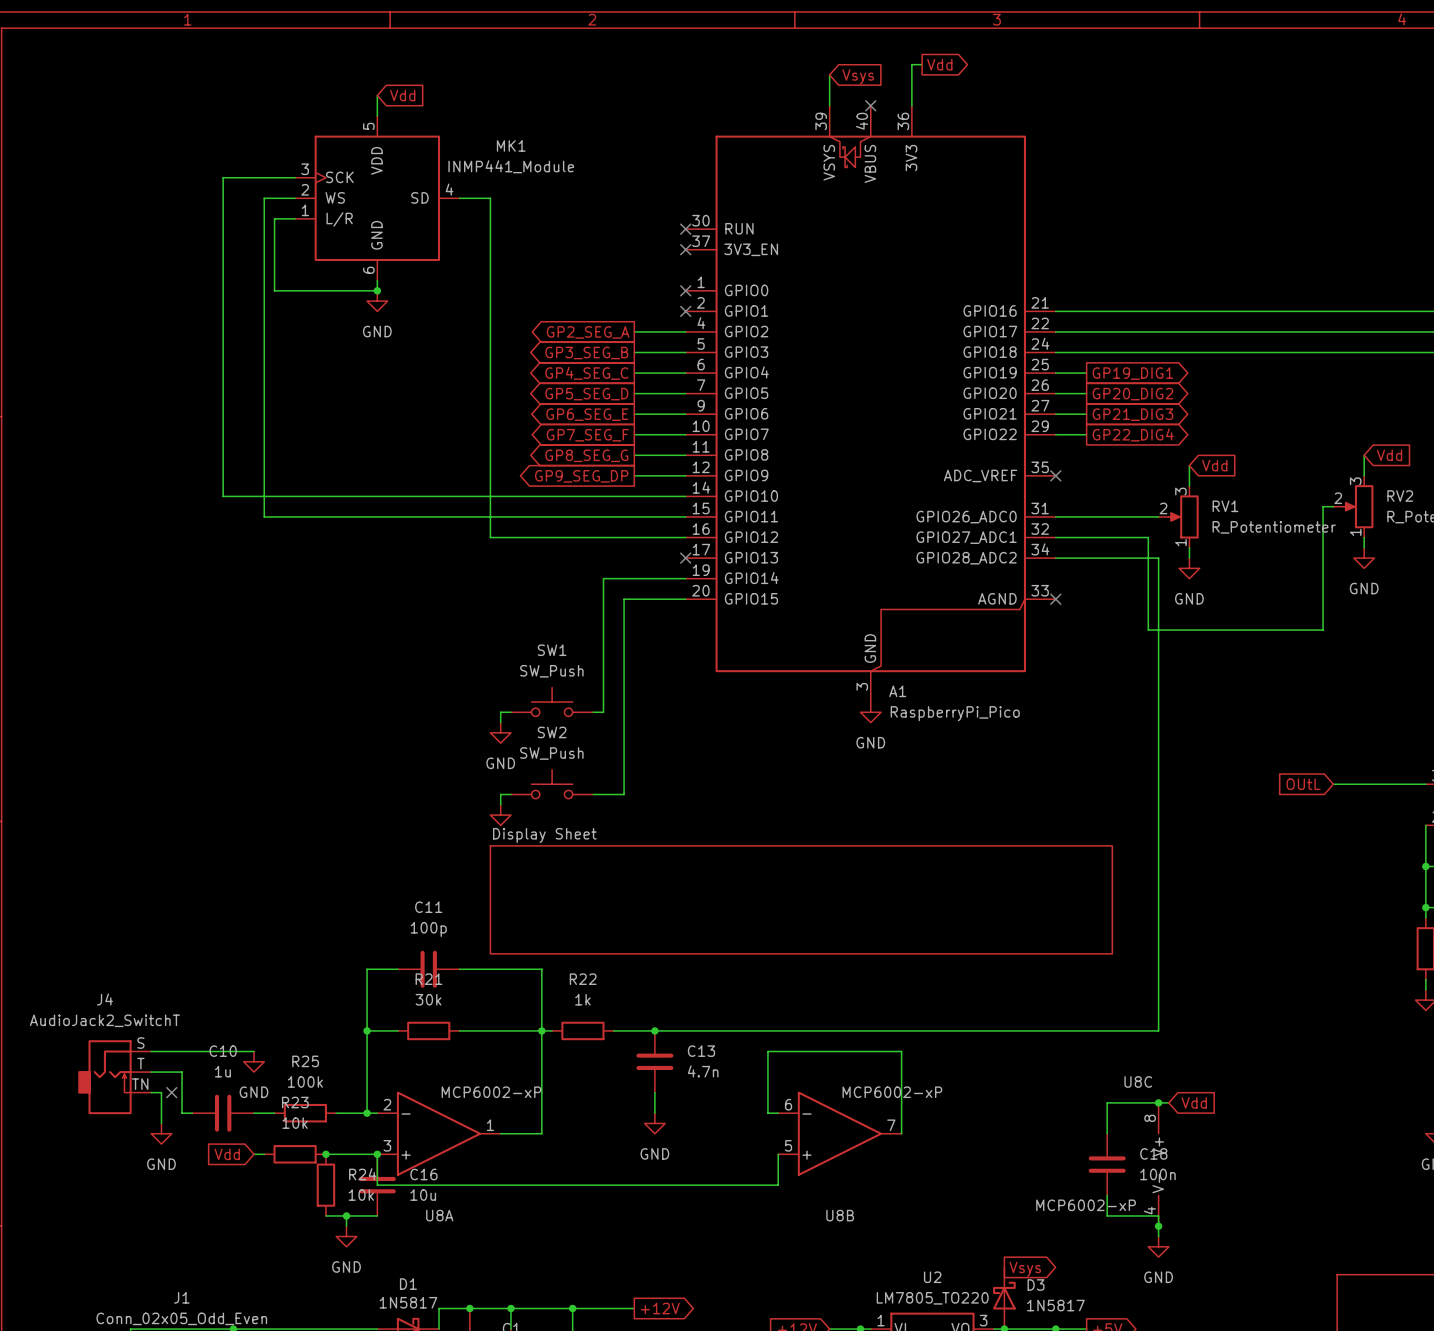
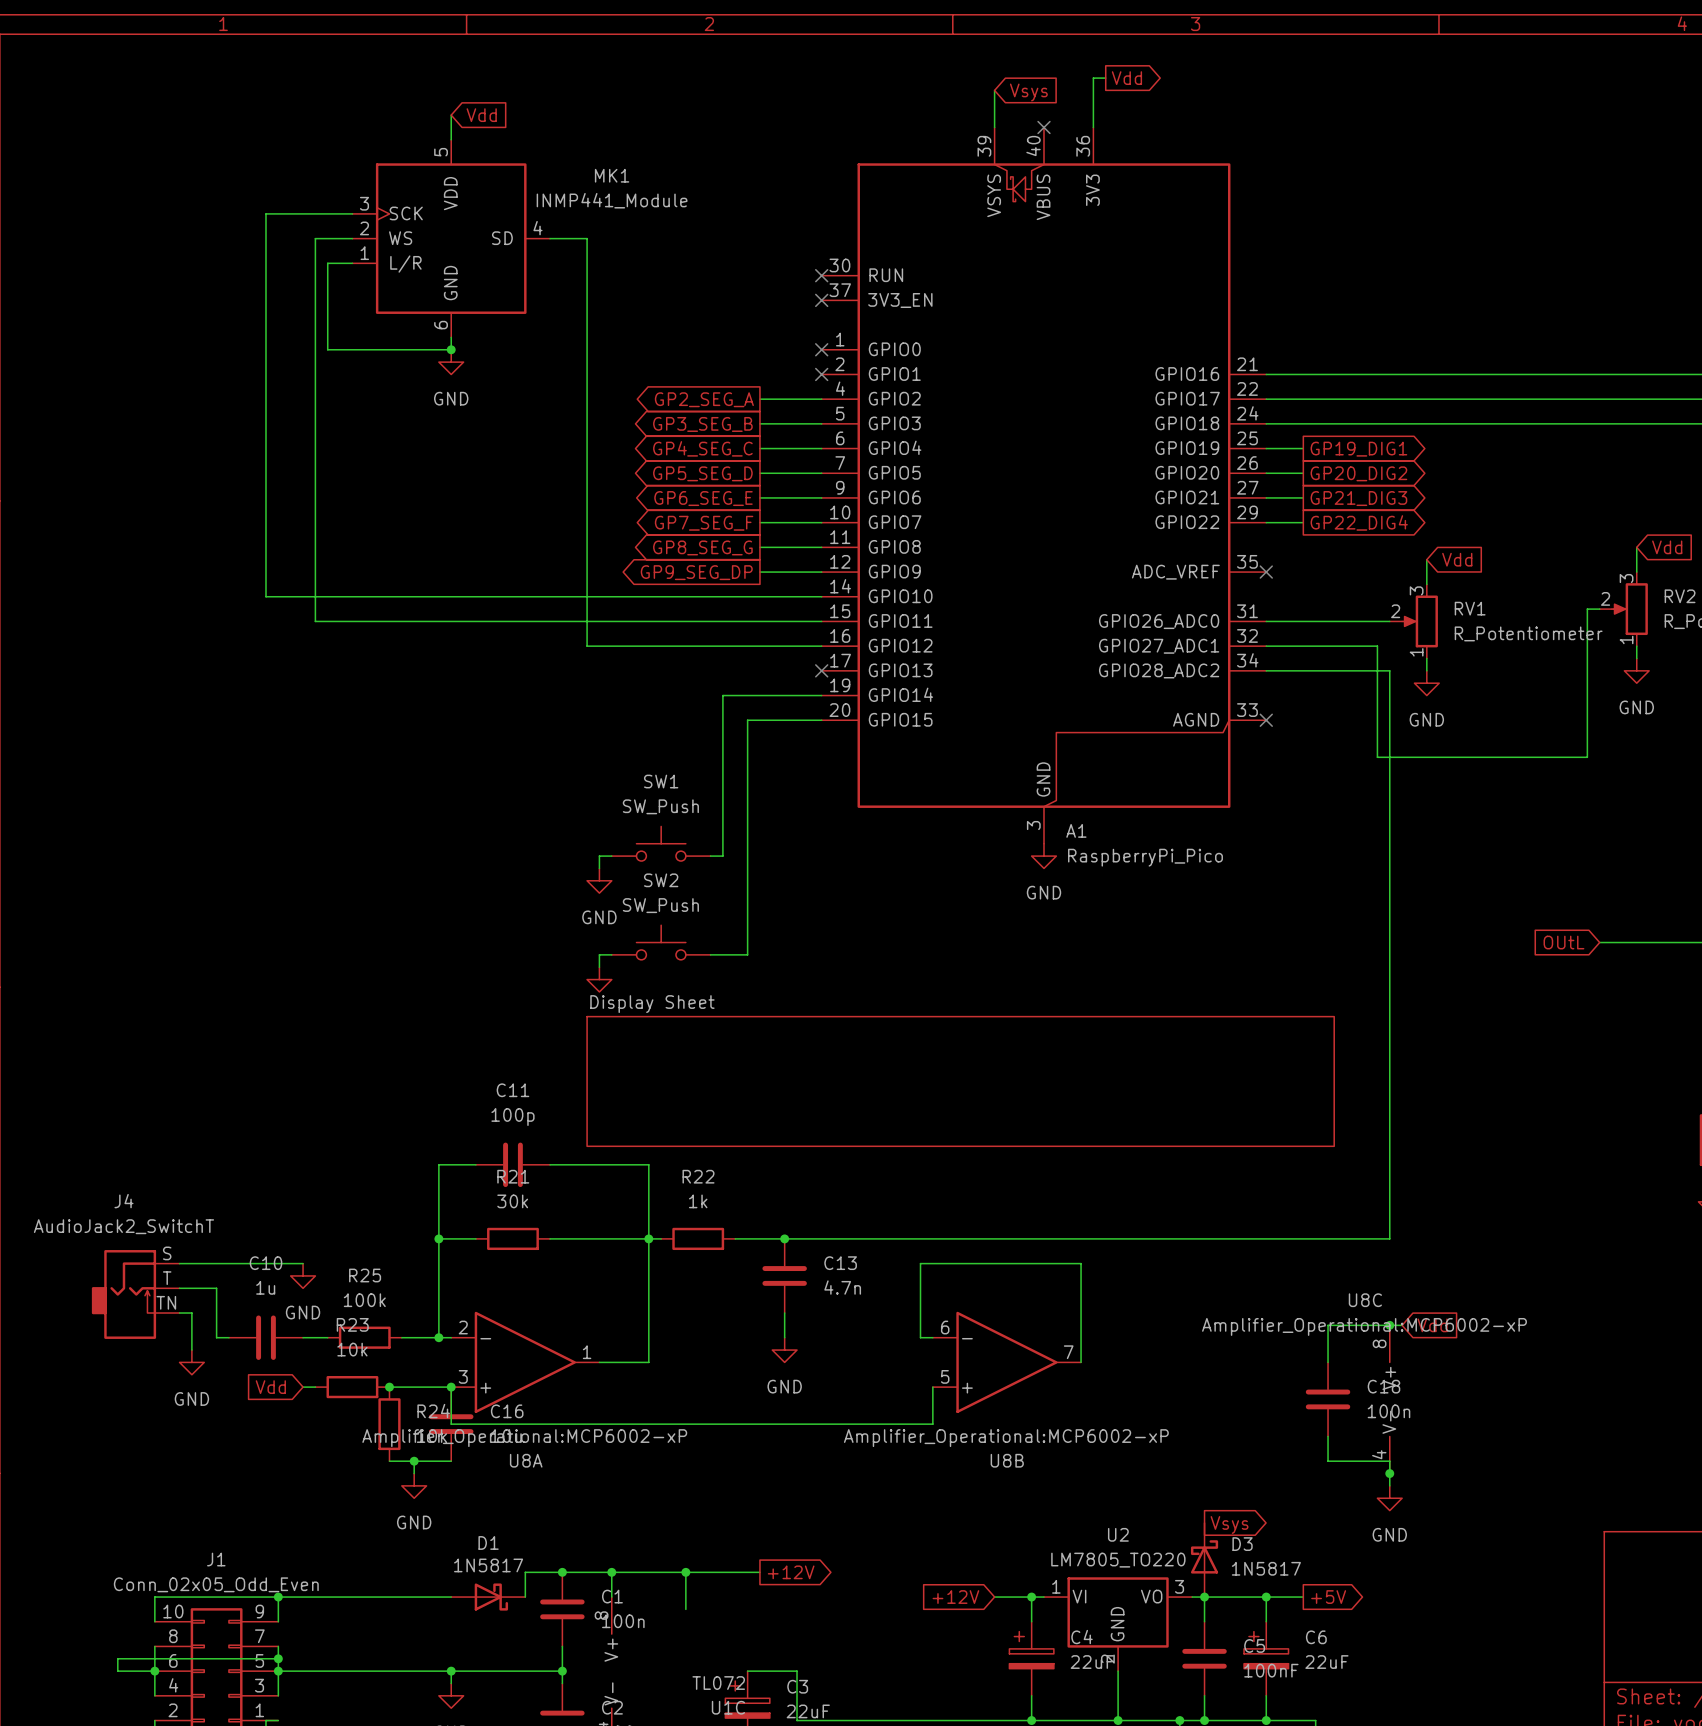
no-connect mark: (171, 1092) -> none
U8A value: MCP6002-xP (491, 1092) -> Amplifier_Operational:MCP6002-xP (524, 1438)
U8B value: MCP6002-xP (892, 1092) -> Amplifier_Operational:MCP6002-xP (1006, 1438)
U8C value: MCP6002-xP (1086, 1205) -> Amplifier_Operational:MCP6002-xP (1364, 1326)

